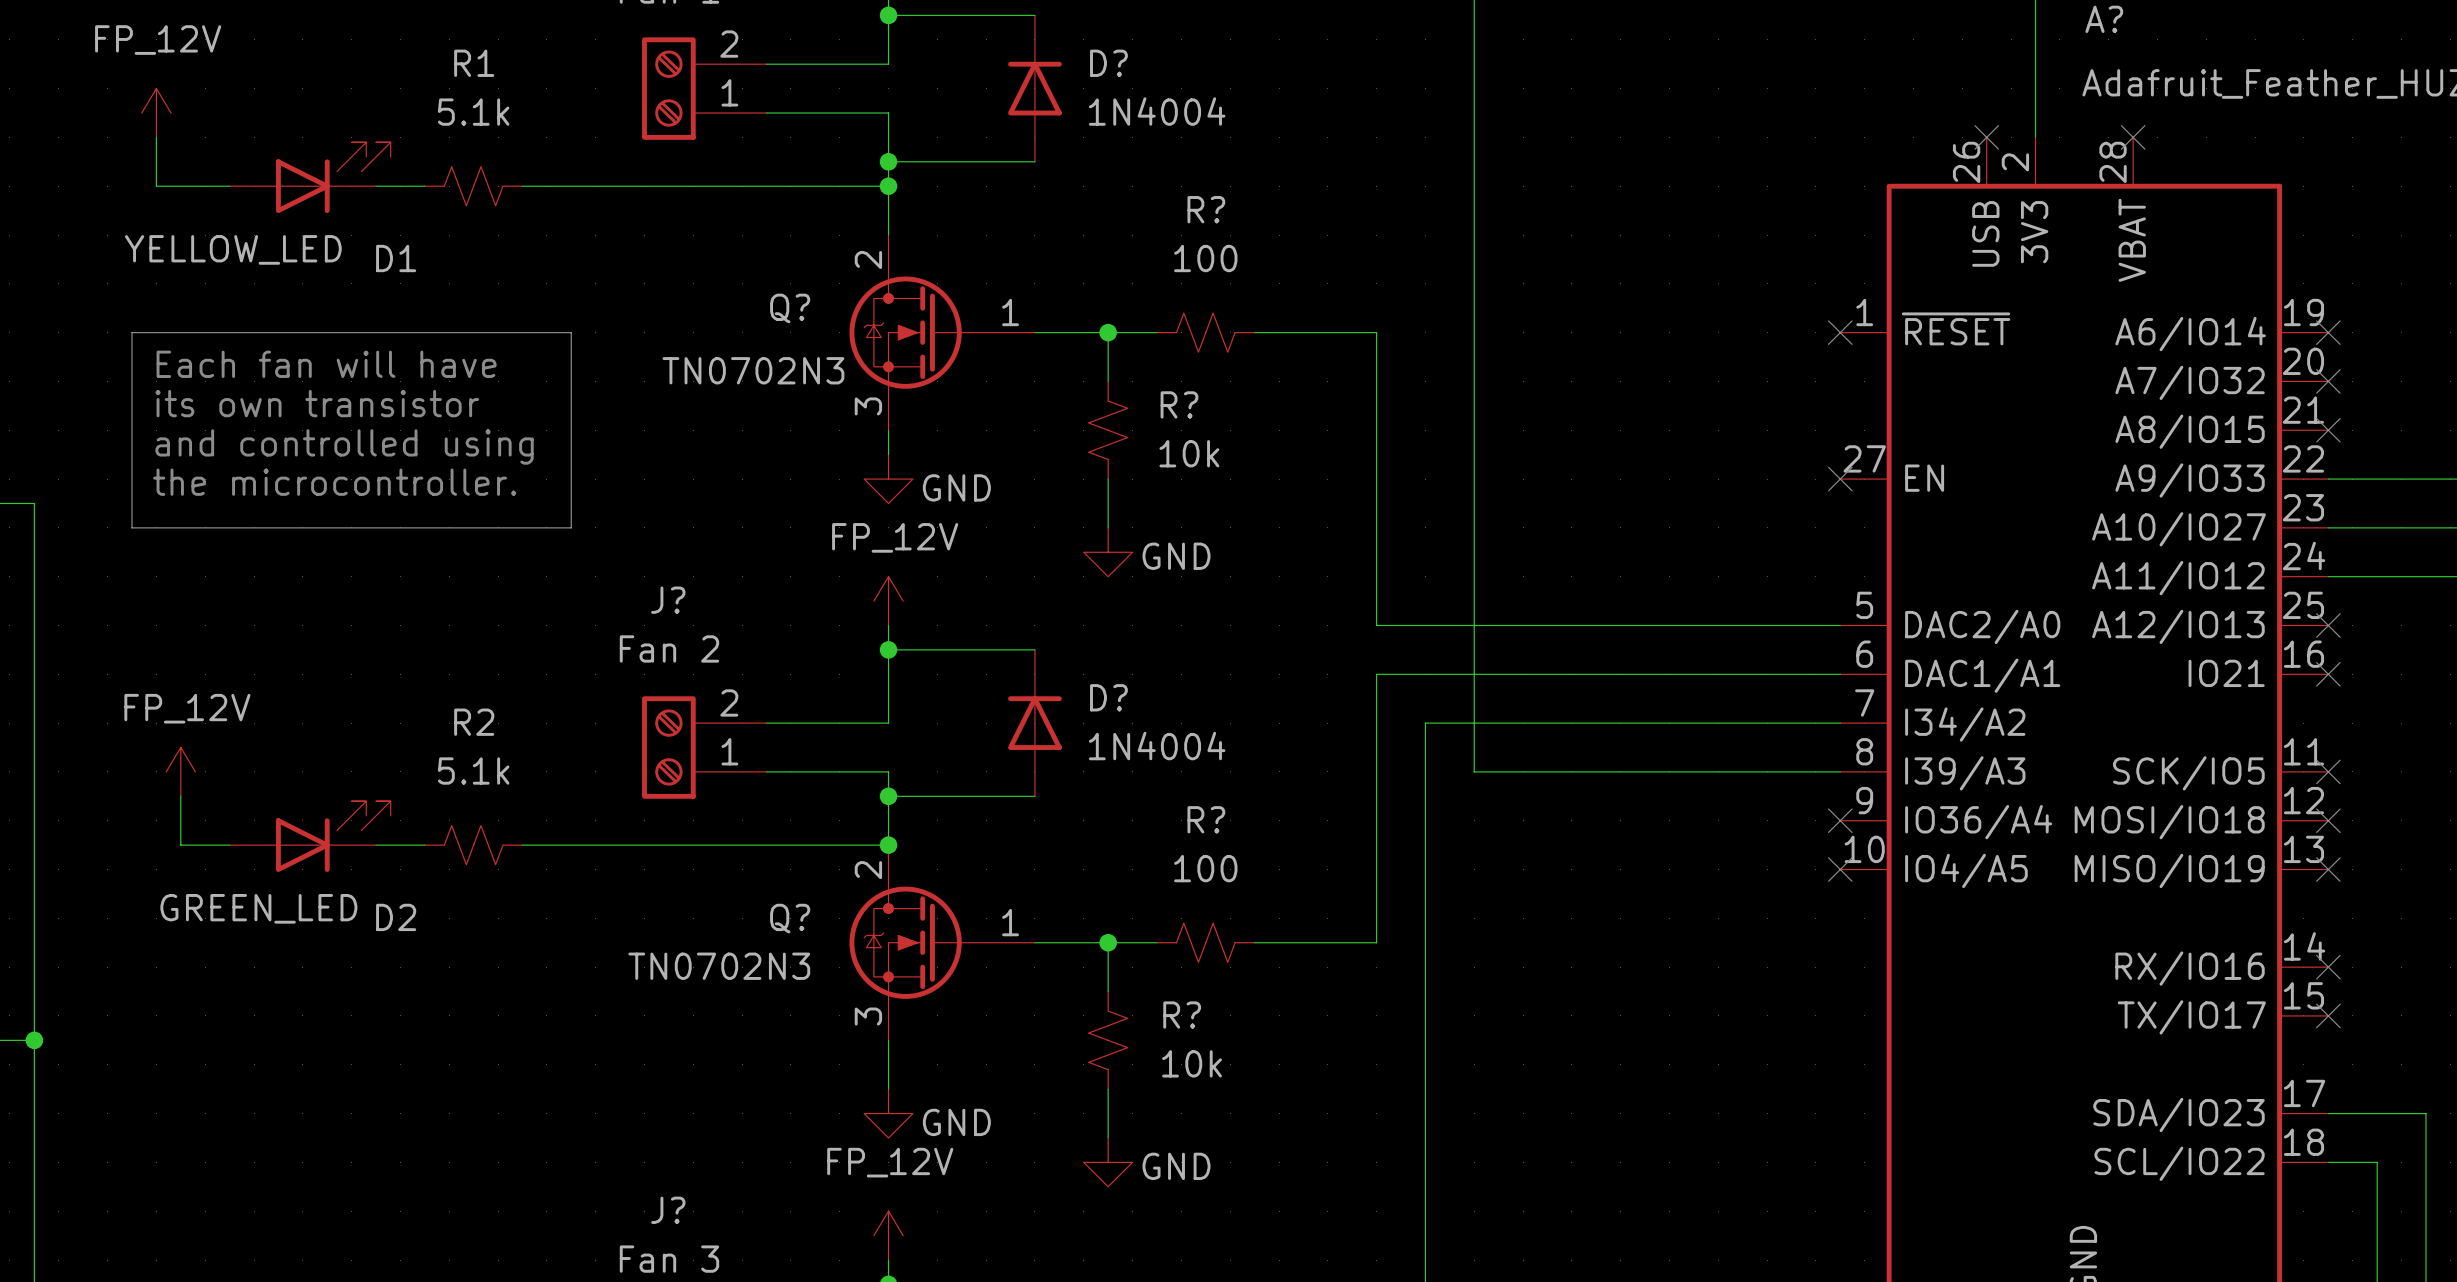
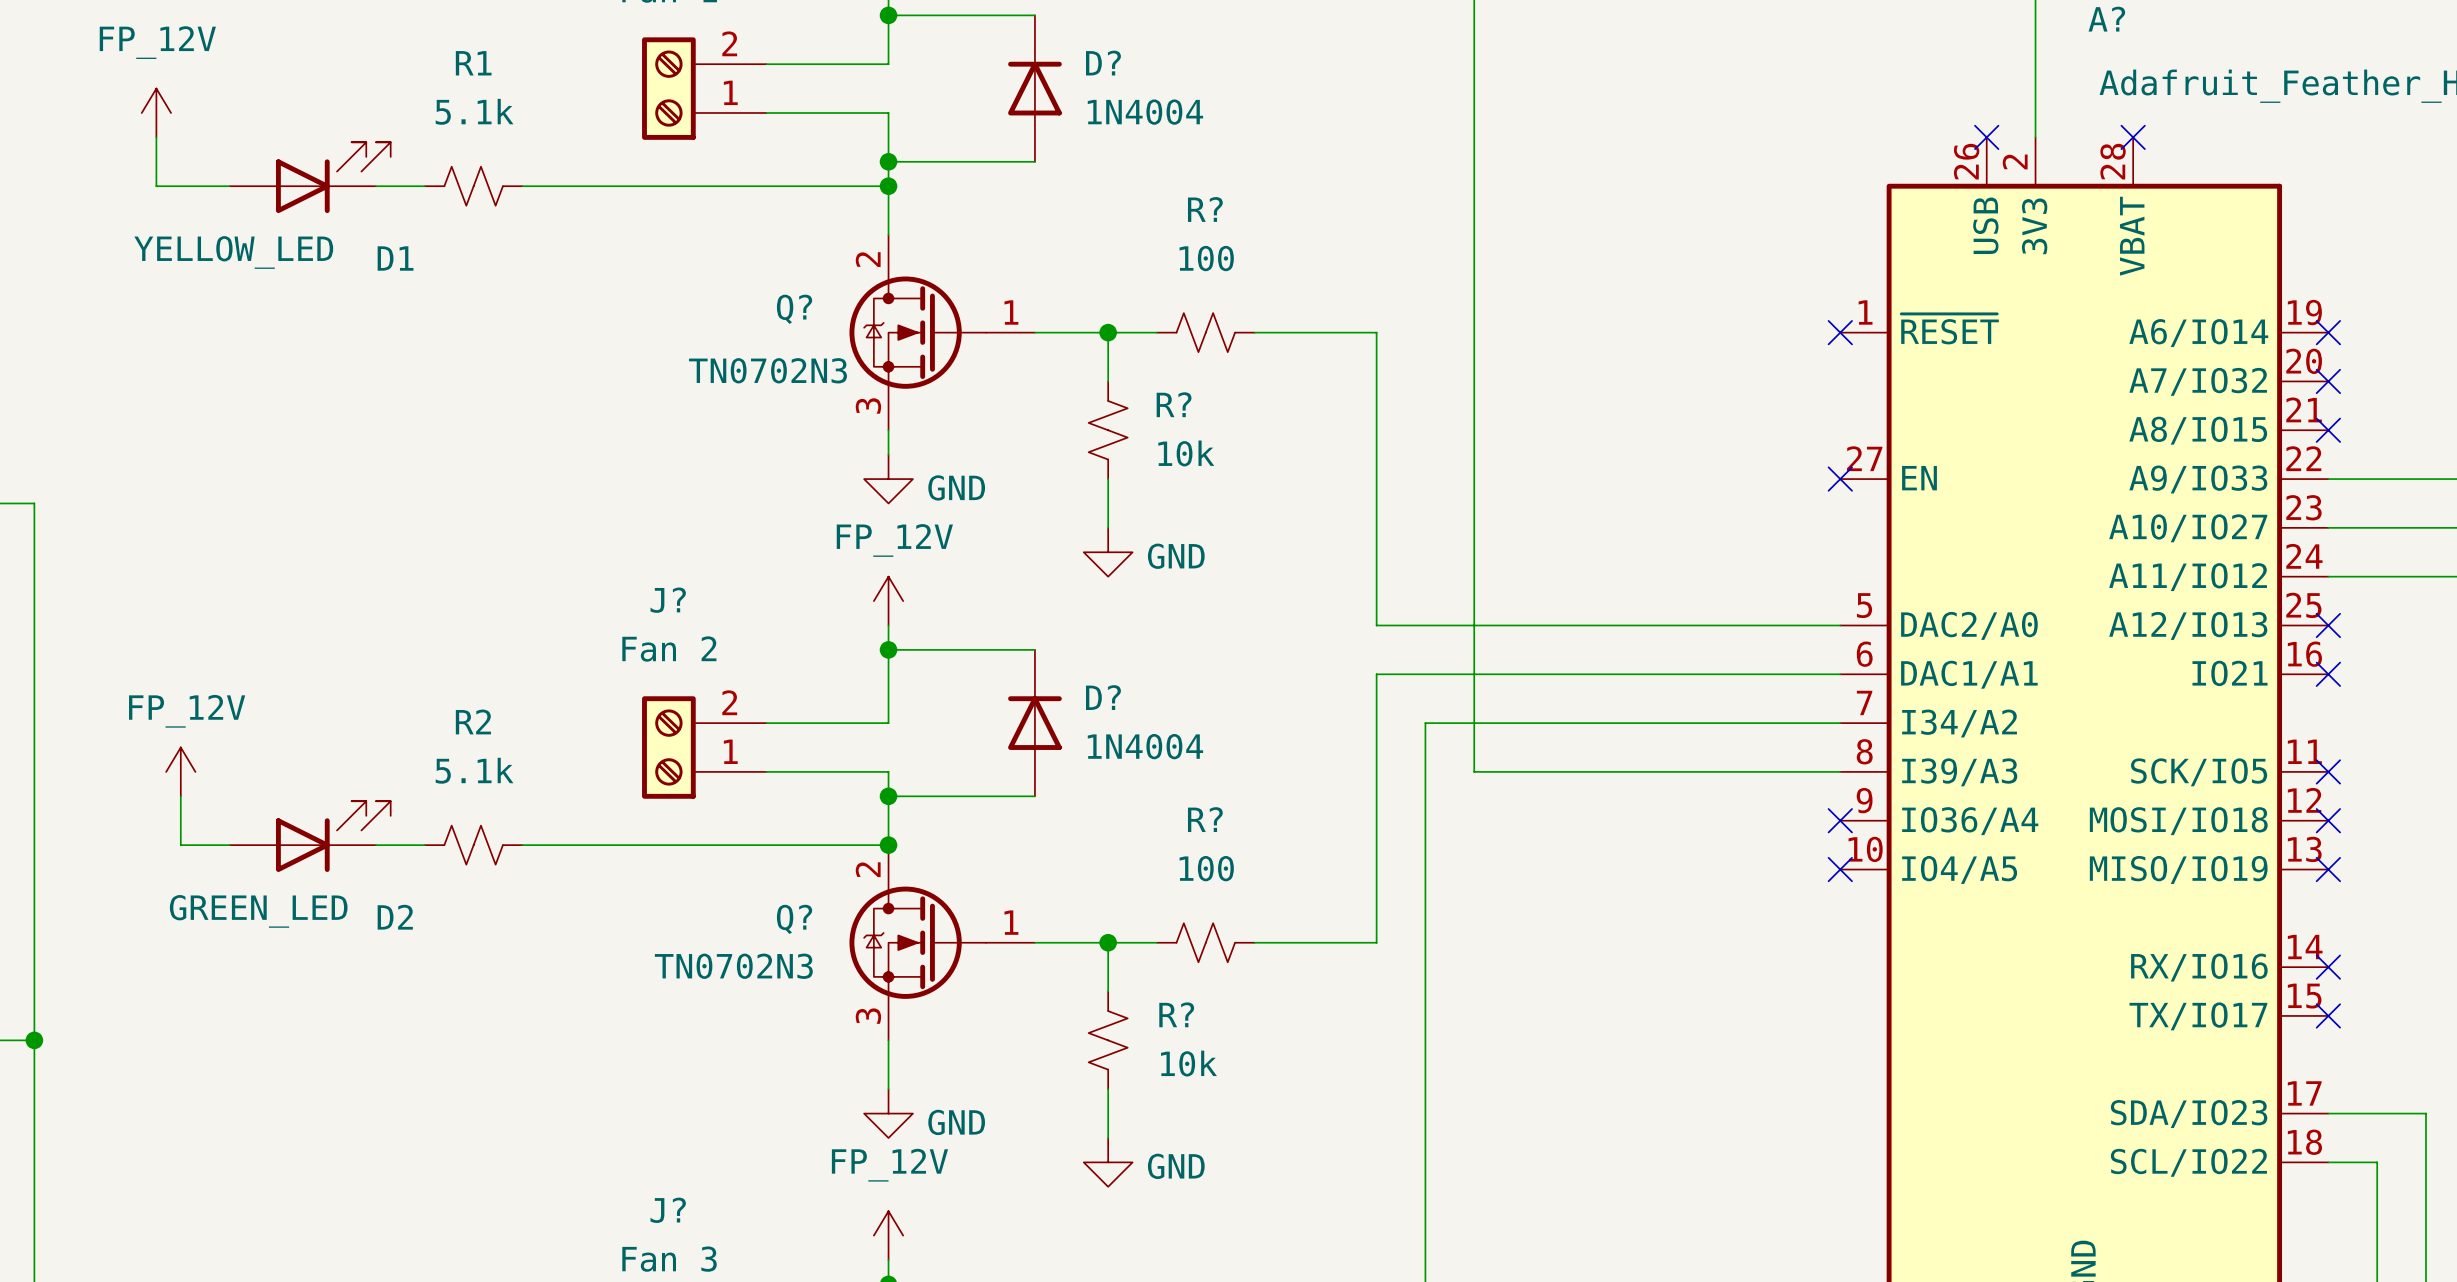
line: (131, 332) (571, 332) (571, 527) (131, 527) (131, 332) -> none
text: Each fan will have (326, 364) -> none
text: its own transistor (317, 403) -> none
text: and controlled using (344, 446) -> none
text: the microcontroller. (334, 482) -> none

